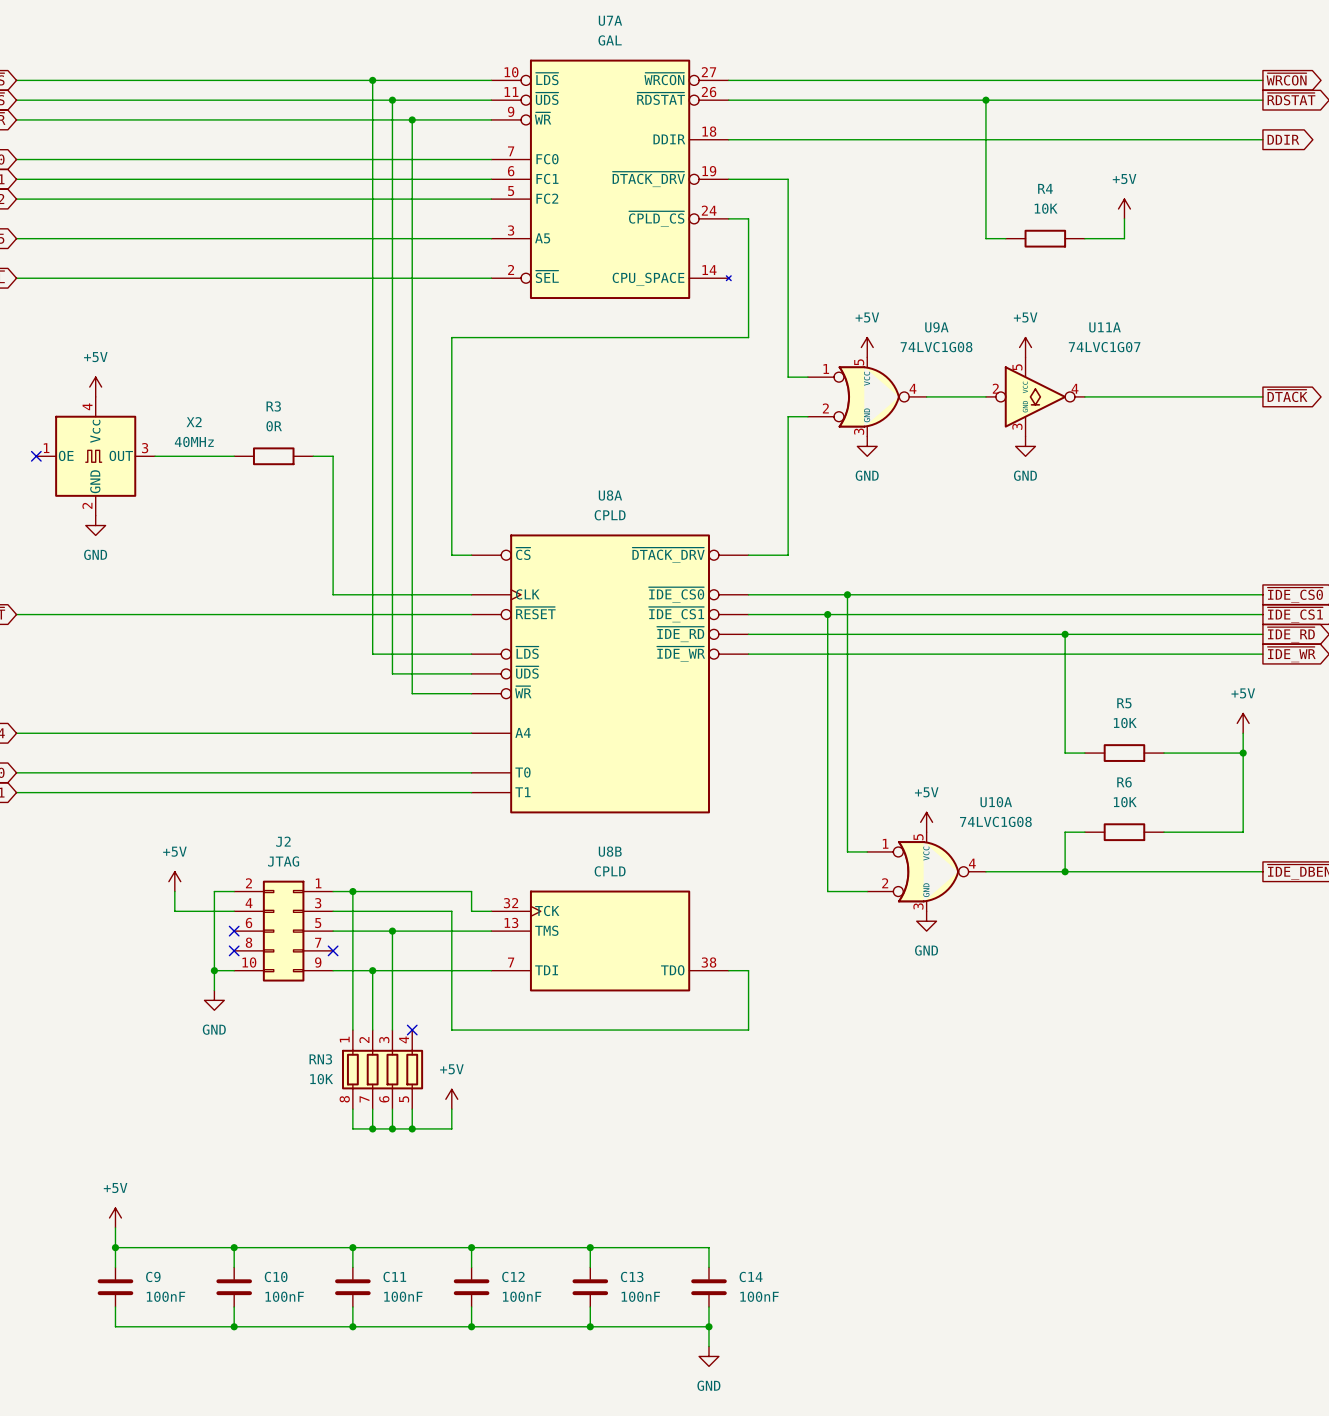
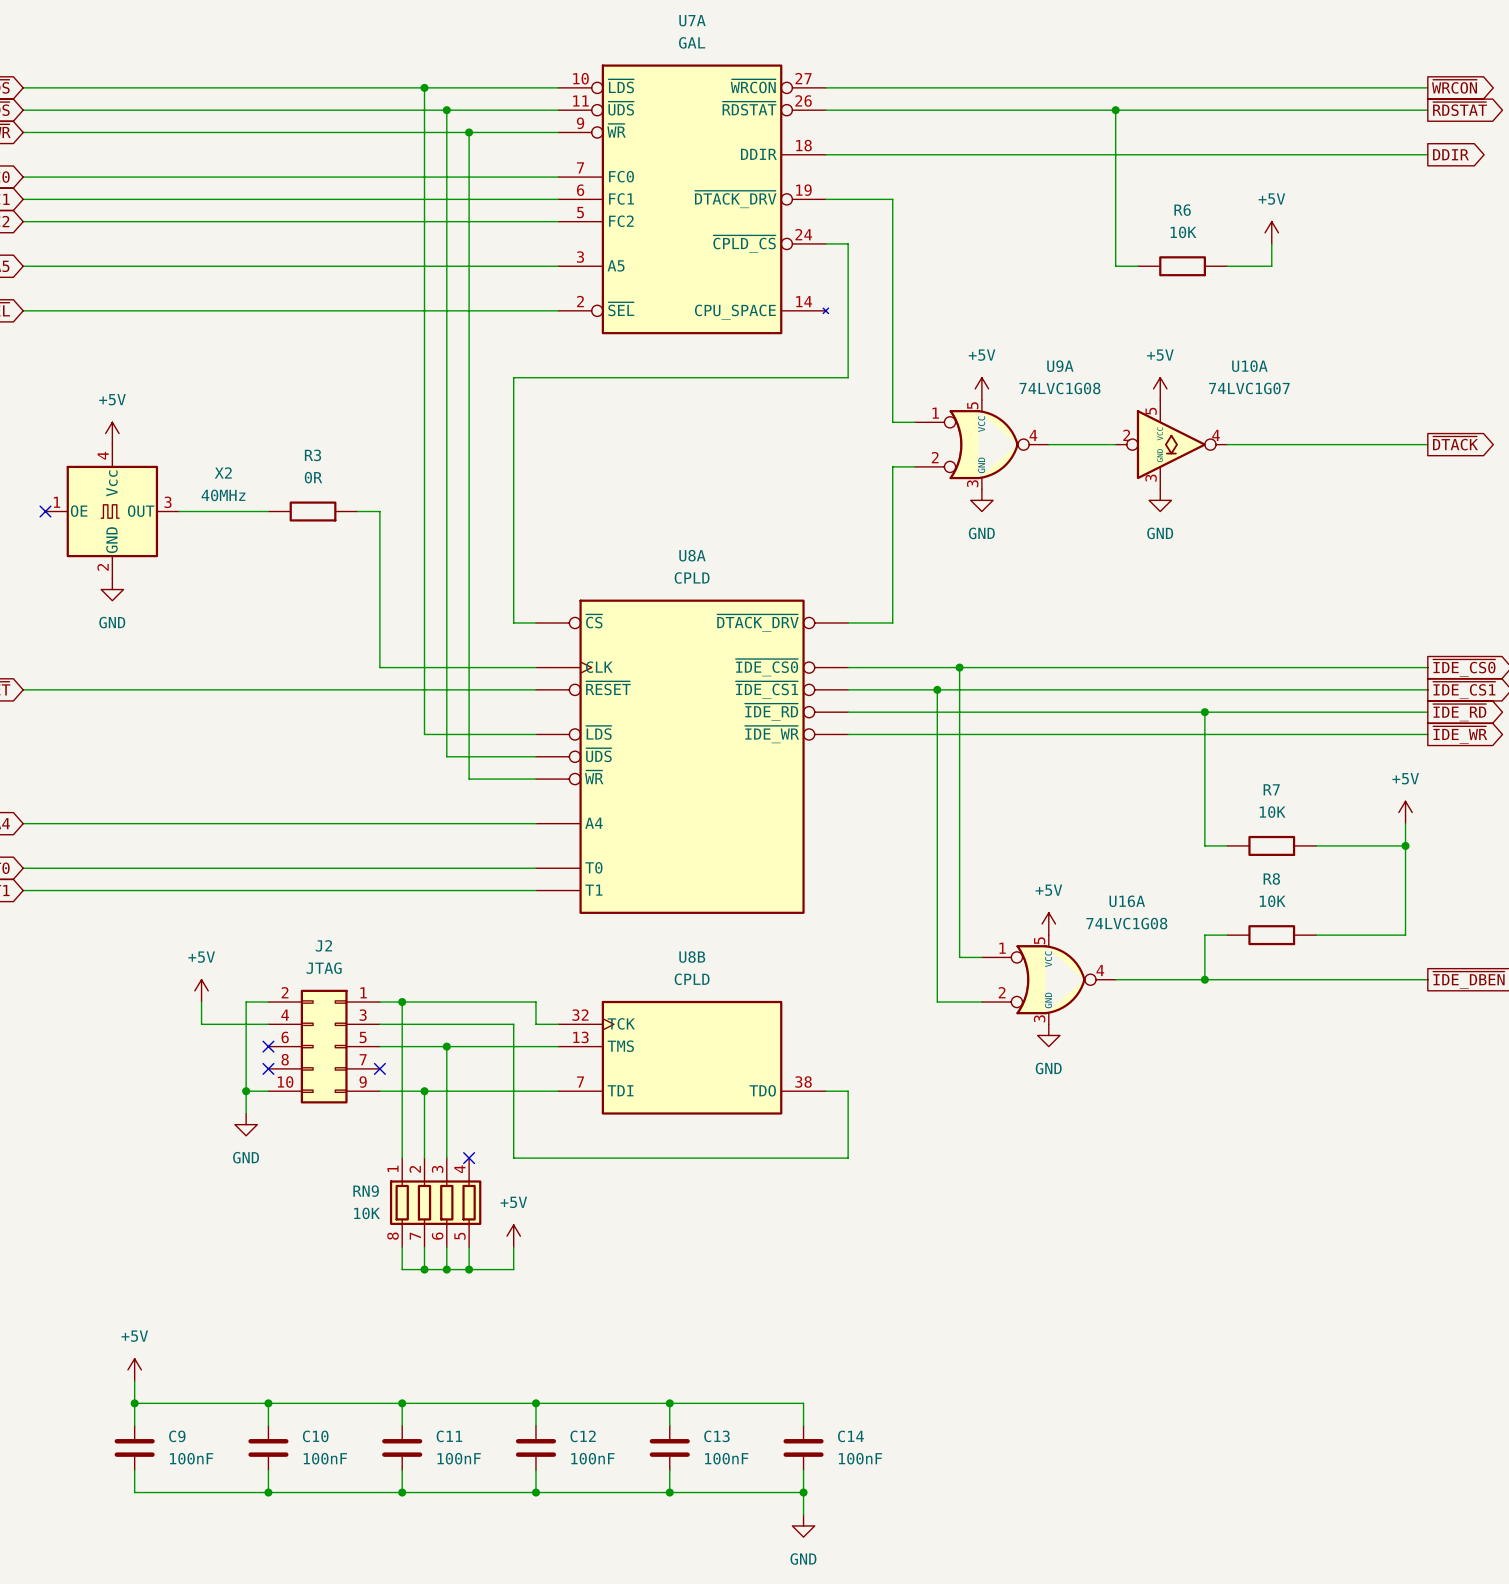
R4 name: R4 (1045, 188) -> R6 (1182, 210)
U11A name: U11A (1105, 327) -> U10A (1249, 366)
R5 name: R5 (1124, 703) -> R7 (1271, 789)
R6 name: R6 (1124, 782) -> R8 (1271, 878)
U10A name: U10A (996, 802) -> U16A (1127, 901)
RN3 name: RN3 (320, 1059) -> RN9 (366, 1191)

